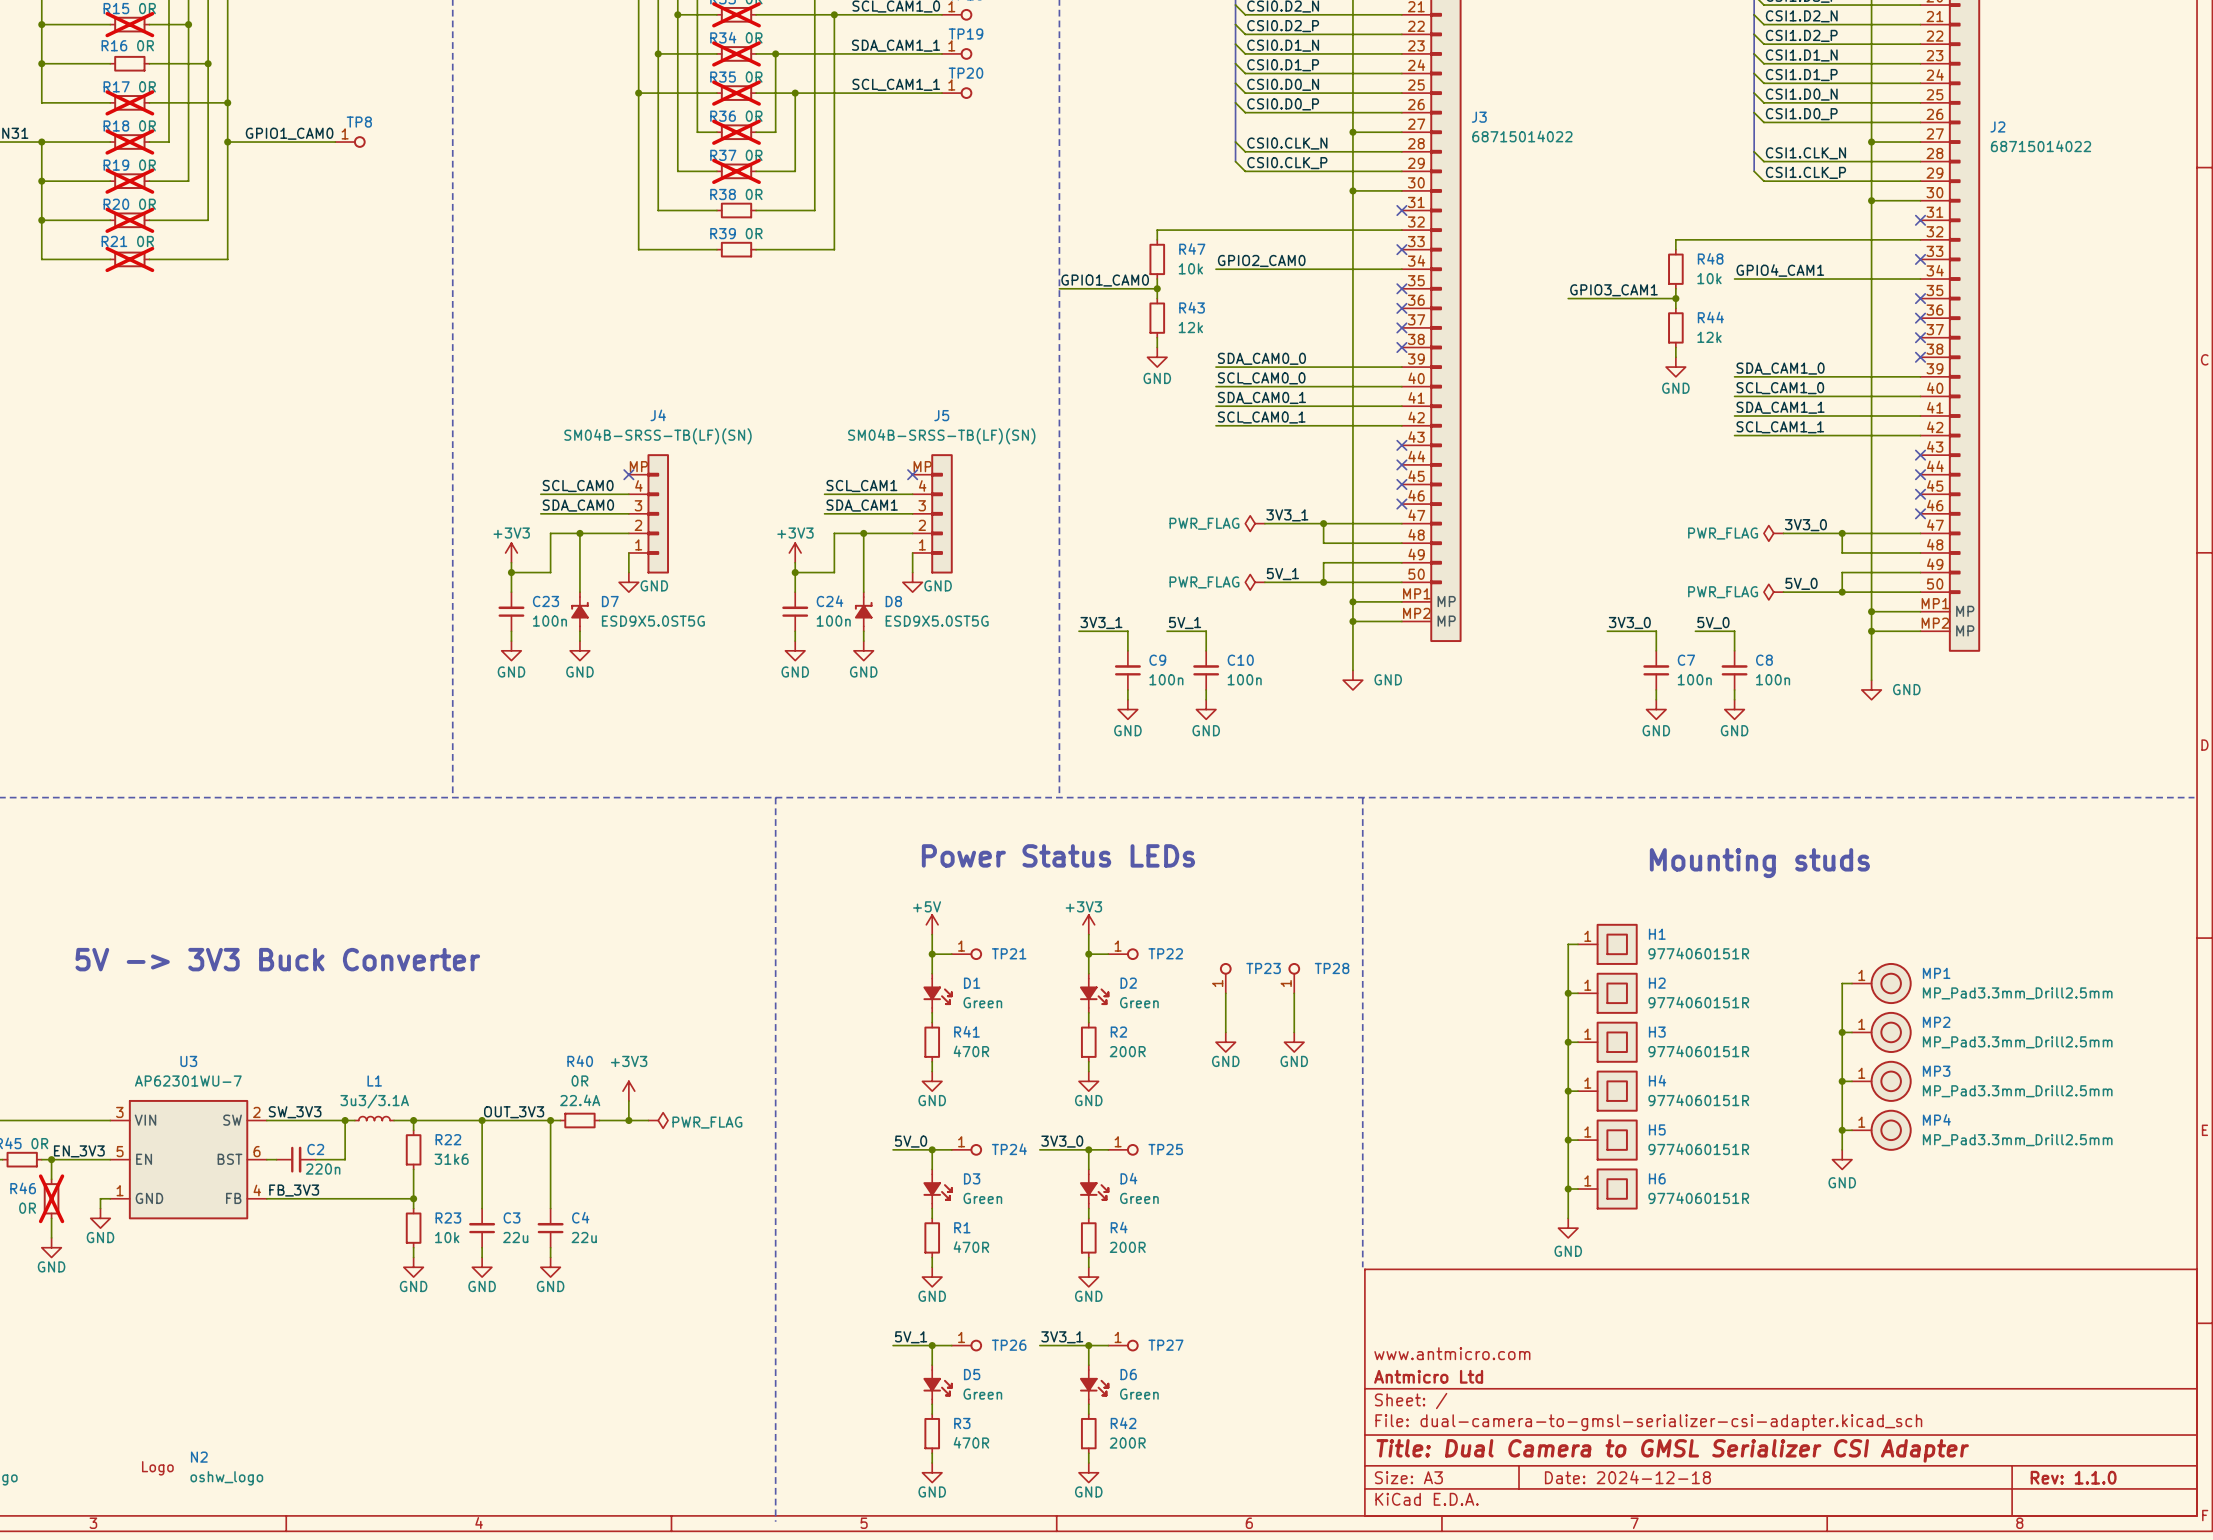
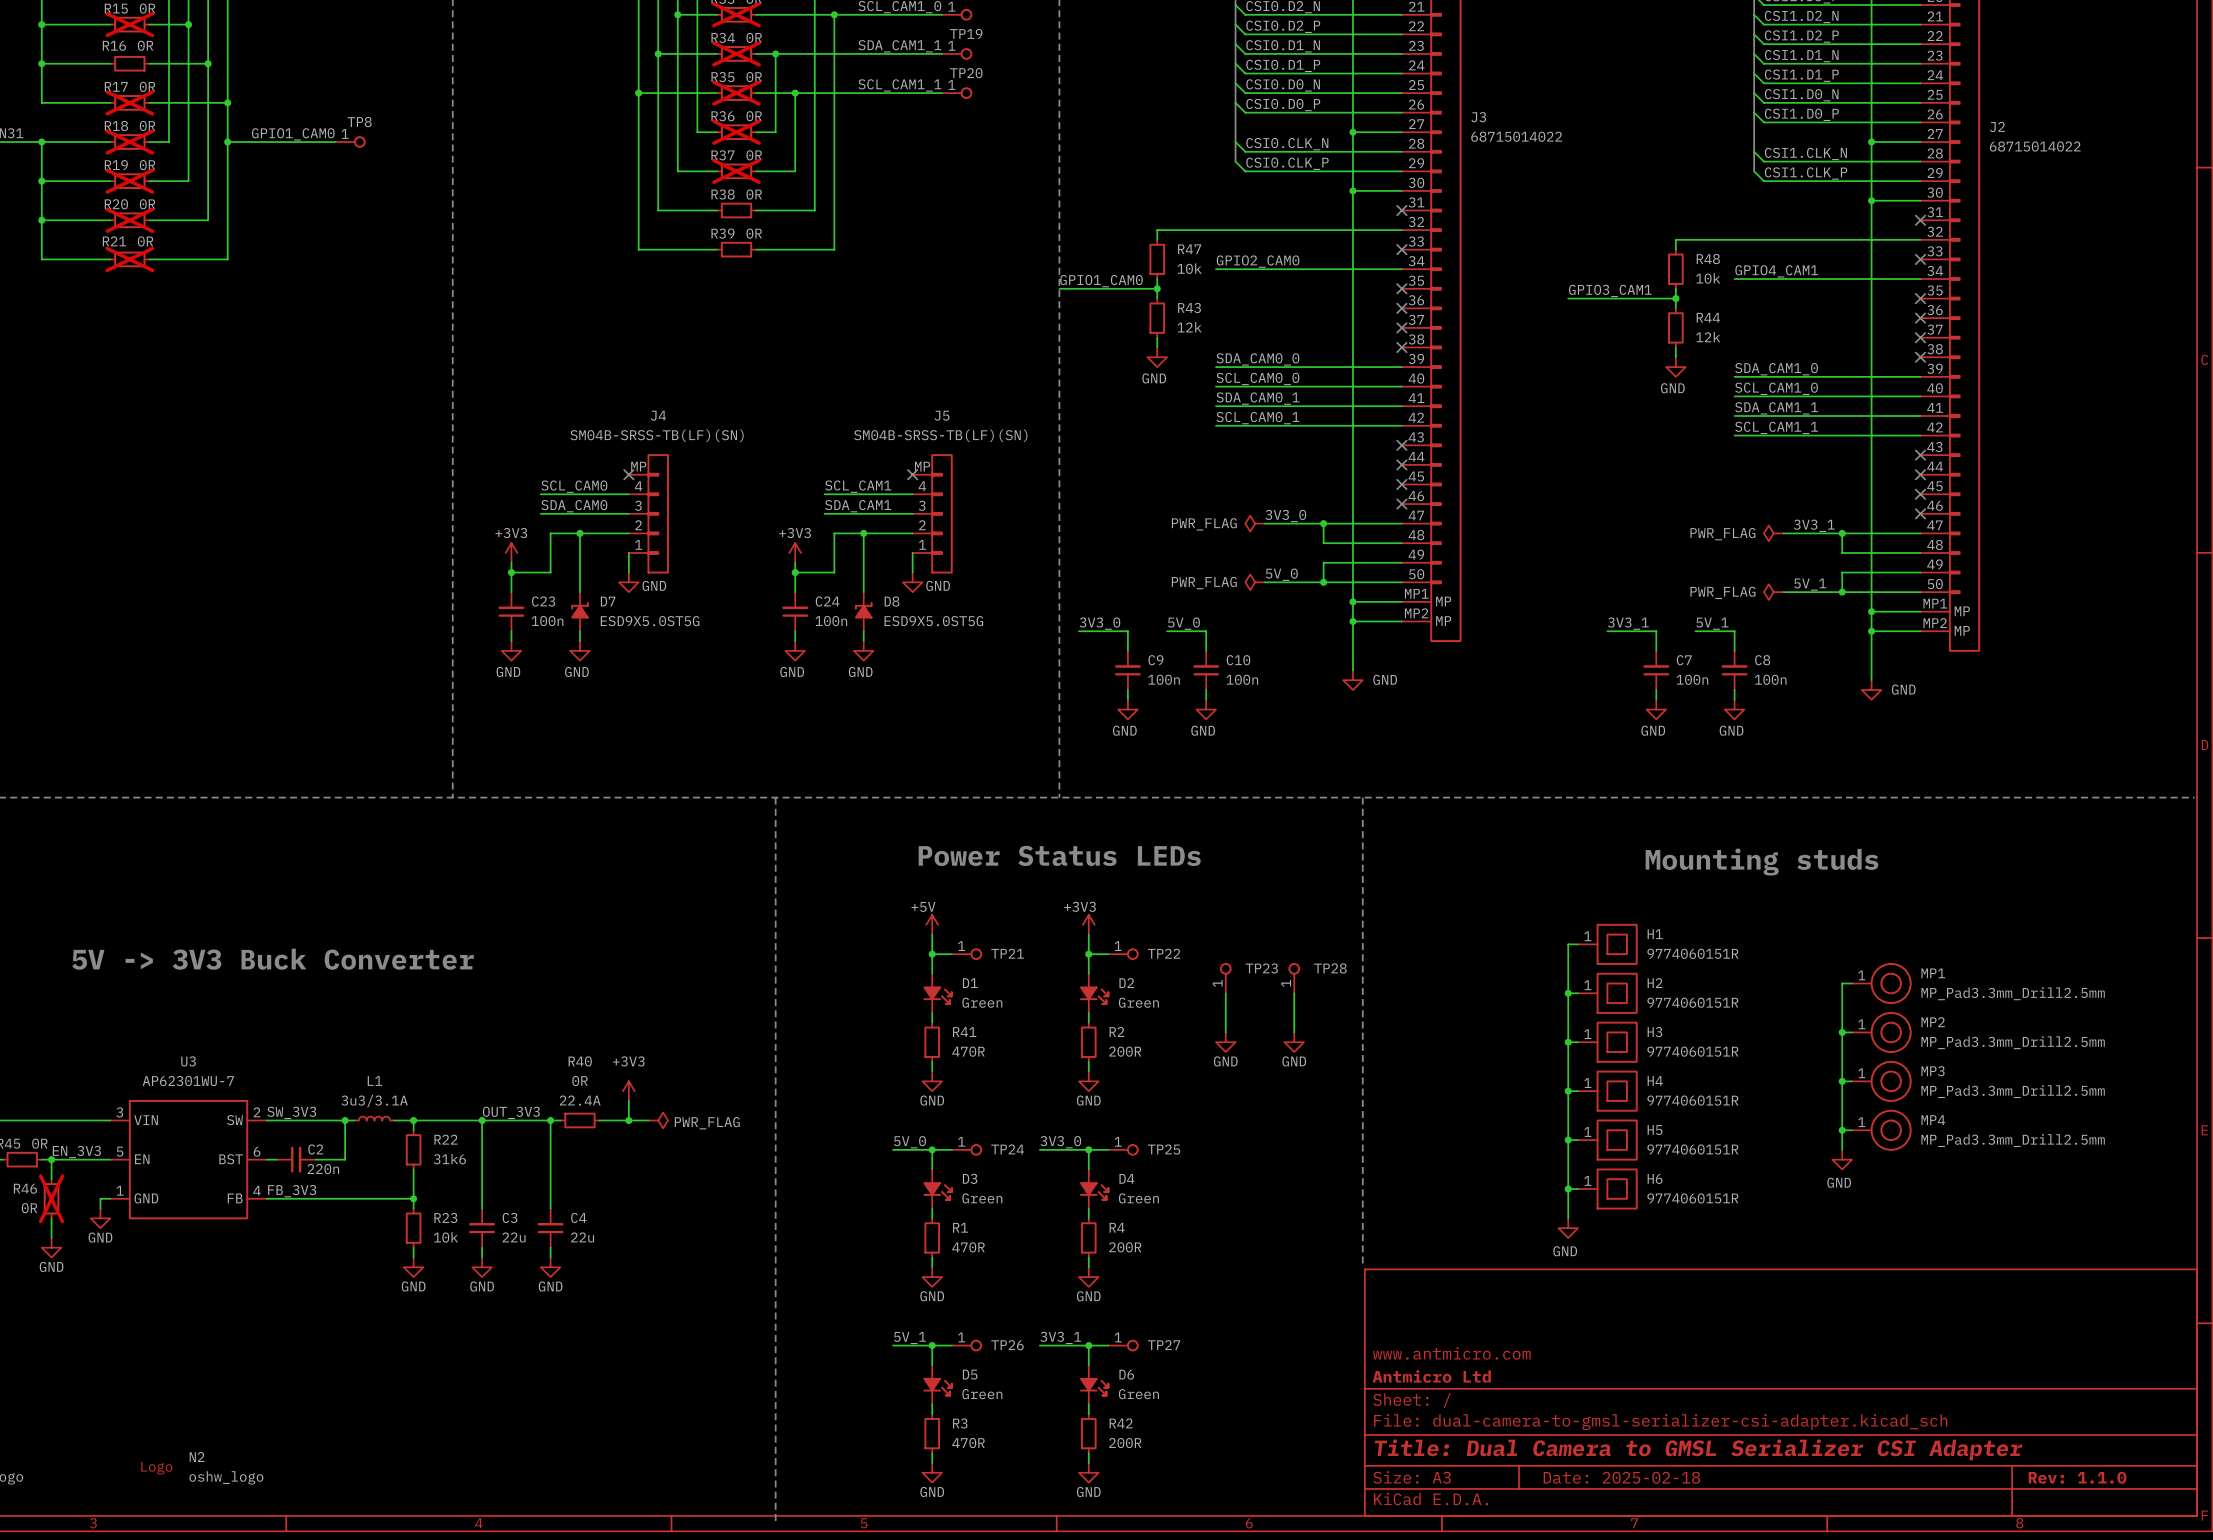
label: 3V3_1 (1287, 515) -> 3V3_0 (1285, 515)
label: 3V3_0 (1805, 525) -> 3V3_1 (1814, 525)
label: 5V_1 (1282, 574) -> 5V_0 (1281, 574)
label: 5V_0 (1801, 583) -> 5V_1 (1810, 584)
label: 3V3_1 (1101, 622) -> 3V3_0 (1099, 623)
label: 5V_1 (1185, 622) -> 5V_0 (1183, 623)
label: 3V3_0 (1629, 622) -> 3V3_1 (1628, 623)
label: 5V_0 (1713, 622) -> 5V_1 (1712, 623)
title block: Date: 2024-12-18 (1627, 1477) -> Date: 2025-02-18 (1621, 1477)

